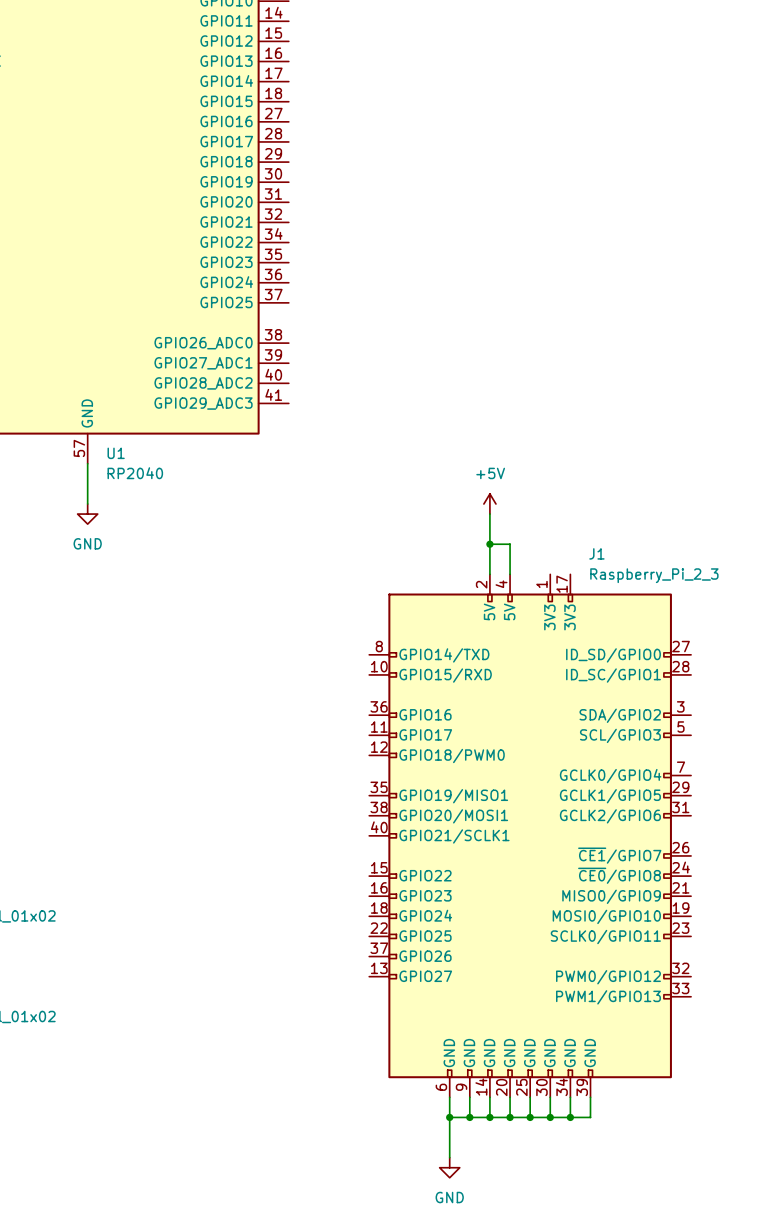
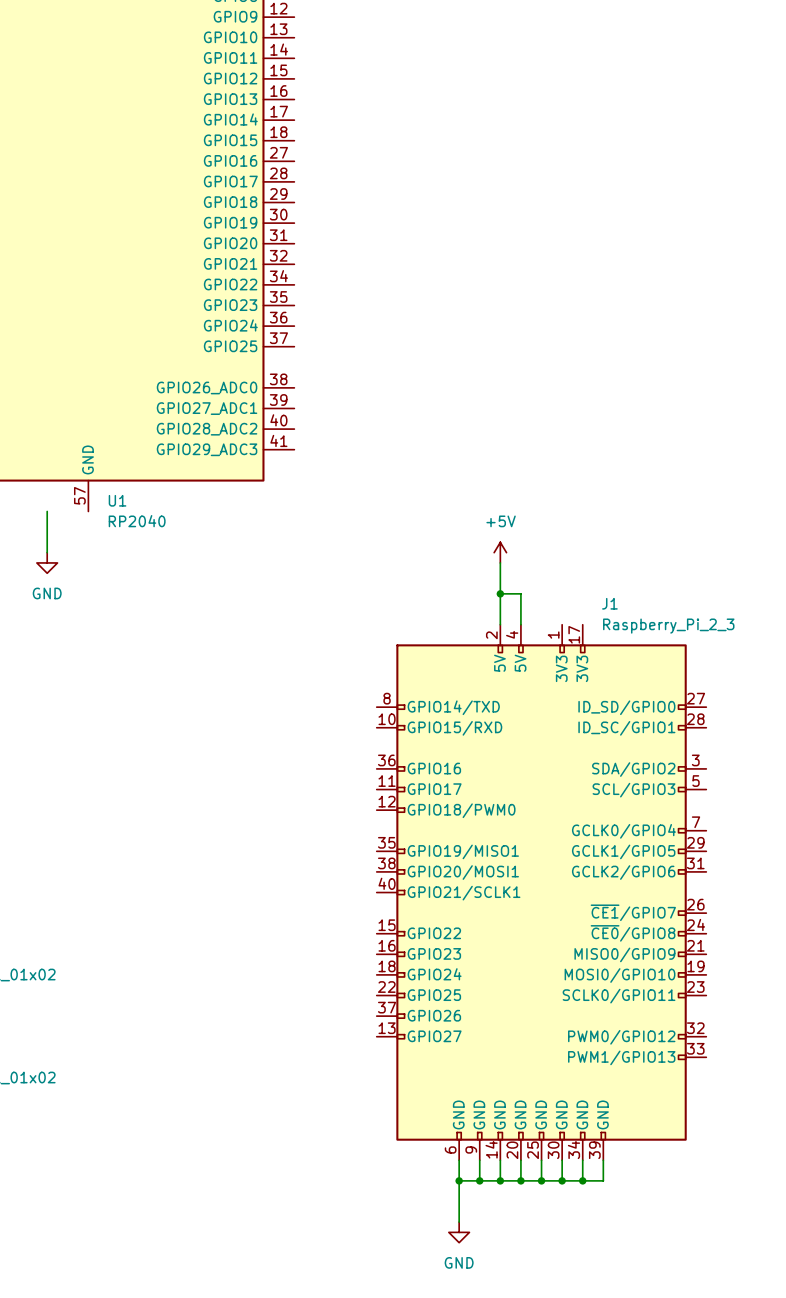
wire: (87, 463) (87, 504) -> (47, 511) (47, 552)
power symbol position: GND (87, 514) -> GND (47, 562)

